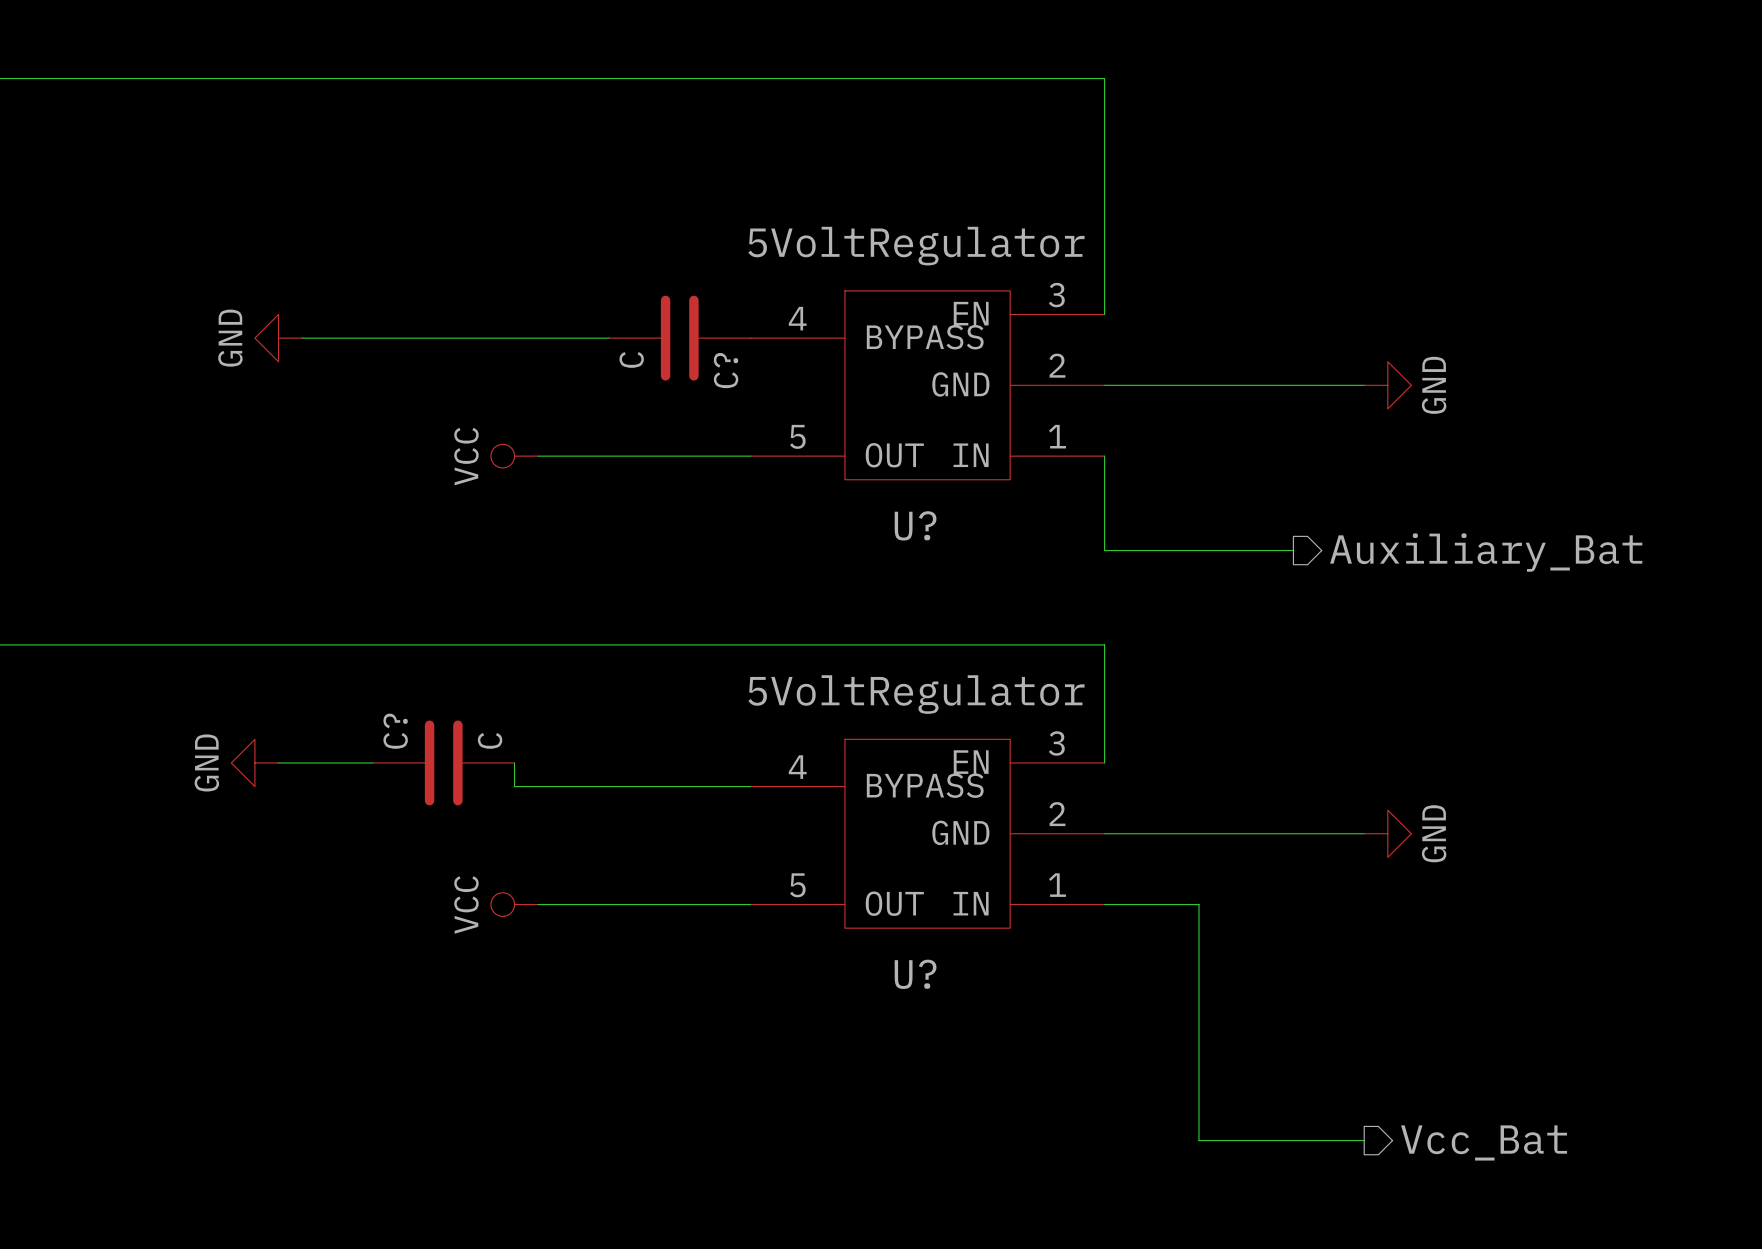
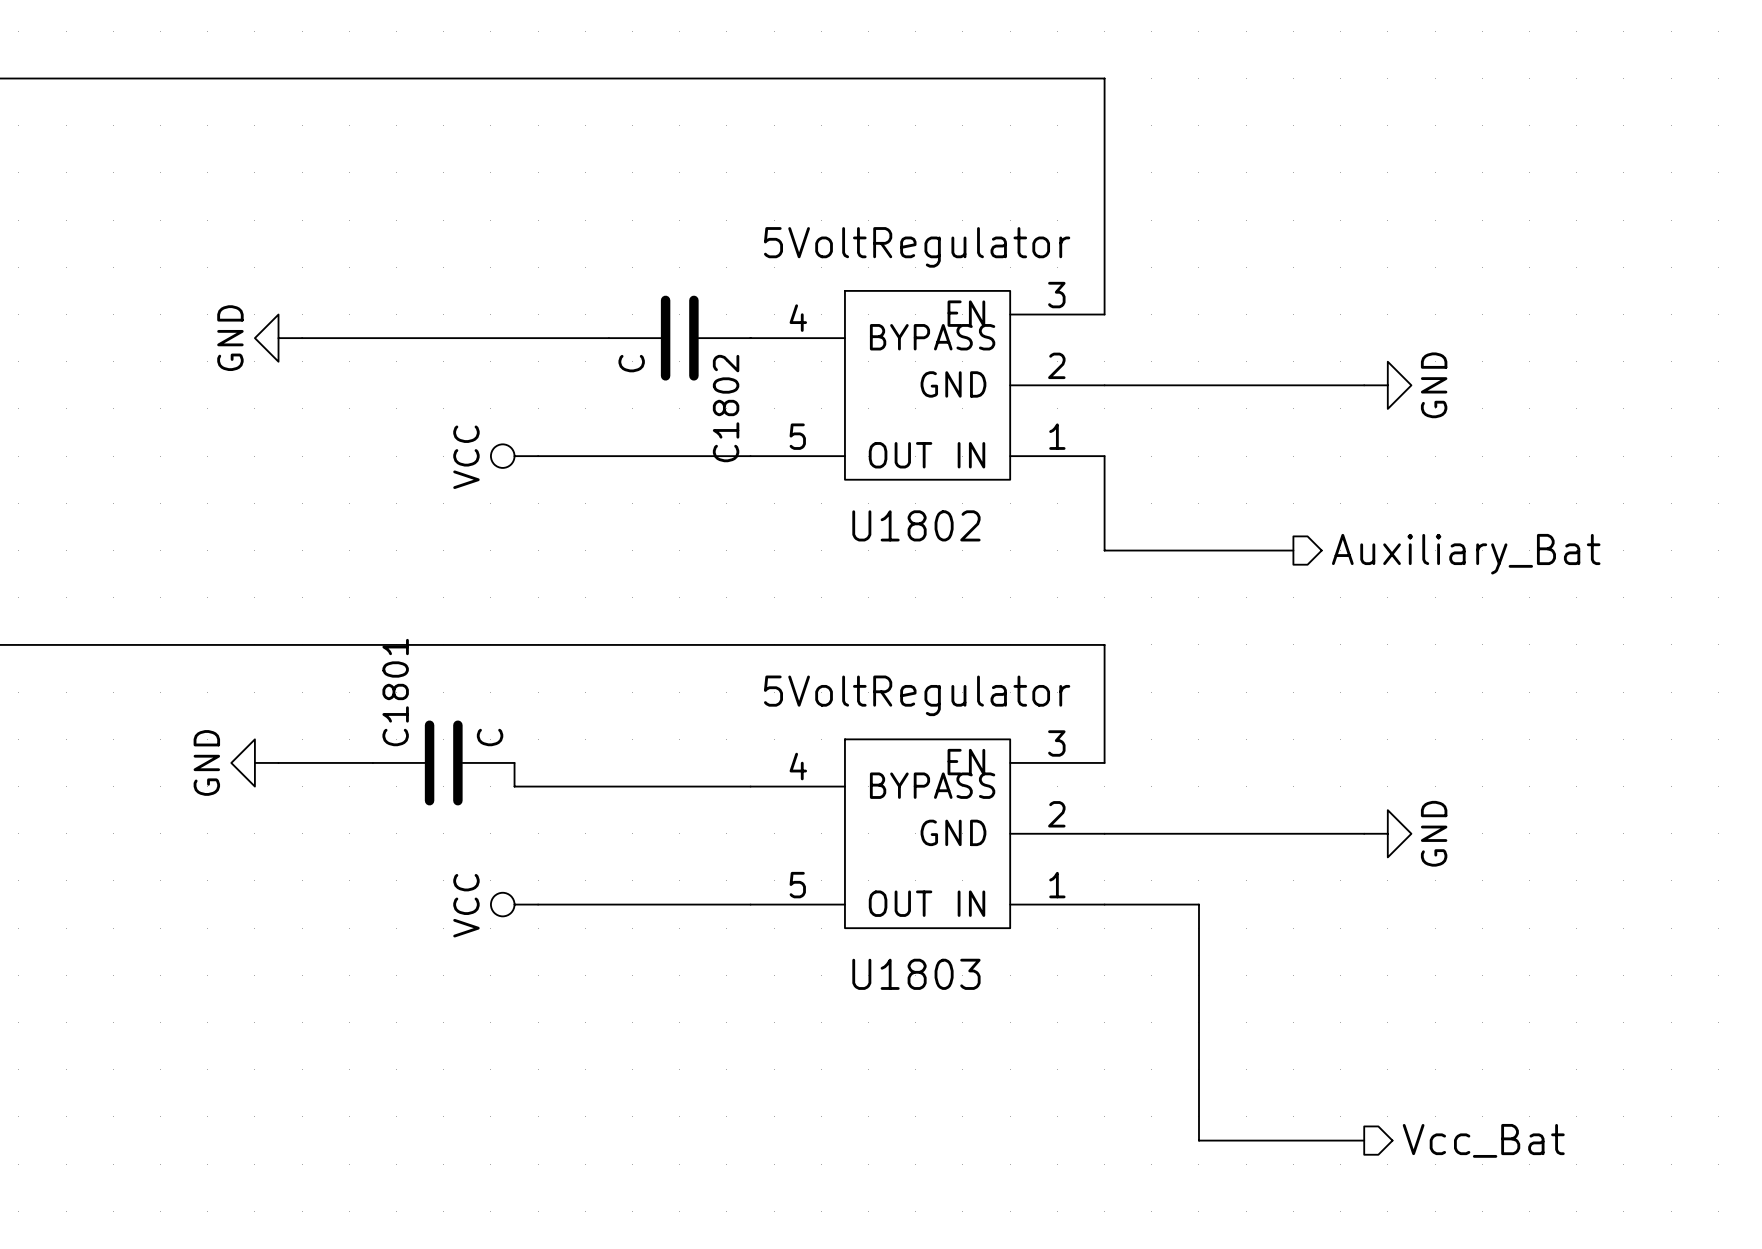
C? name: C? (726, 370) -> C1802 (726, 408)
U? name: U? (915, 525) -> U1802 (916, 525)
C? name: C? (395, 731) -> C1801 (395, 692)
U? name: U? (915, 974) -> U1803 (916, 974)

